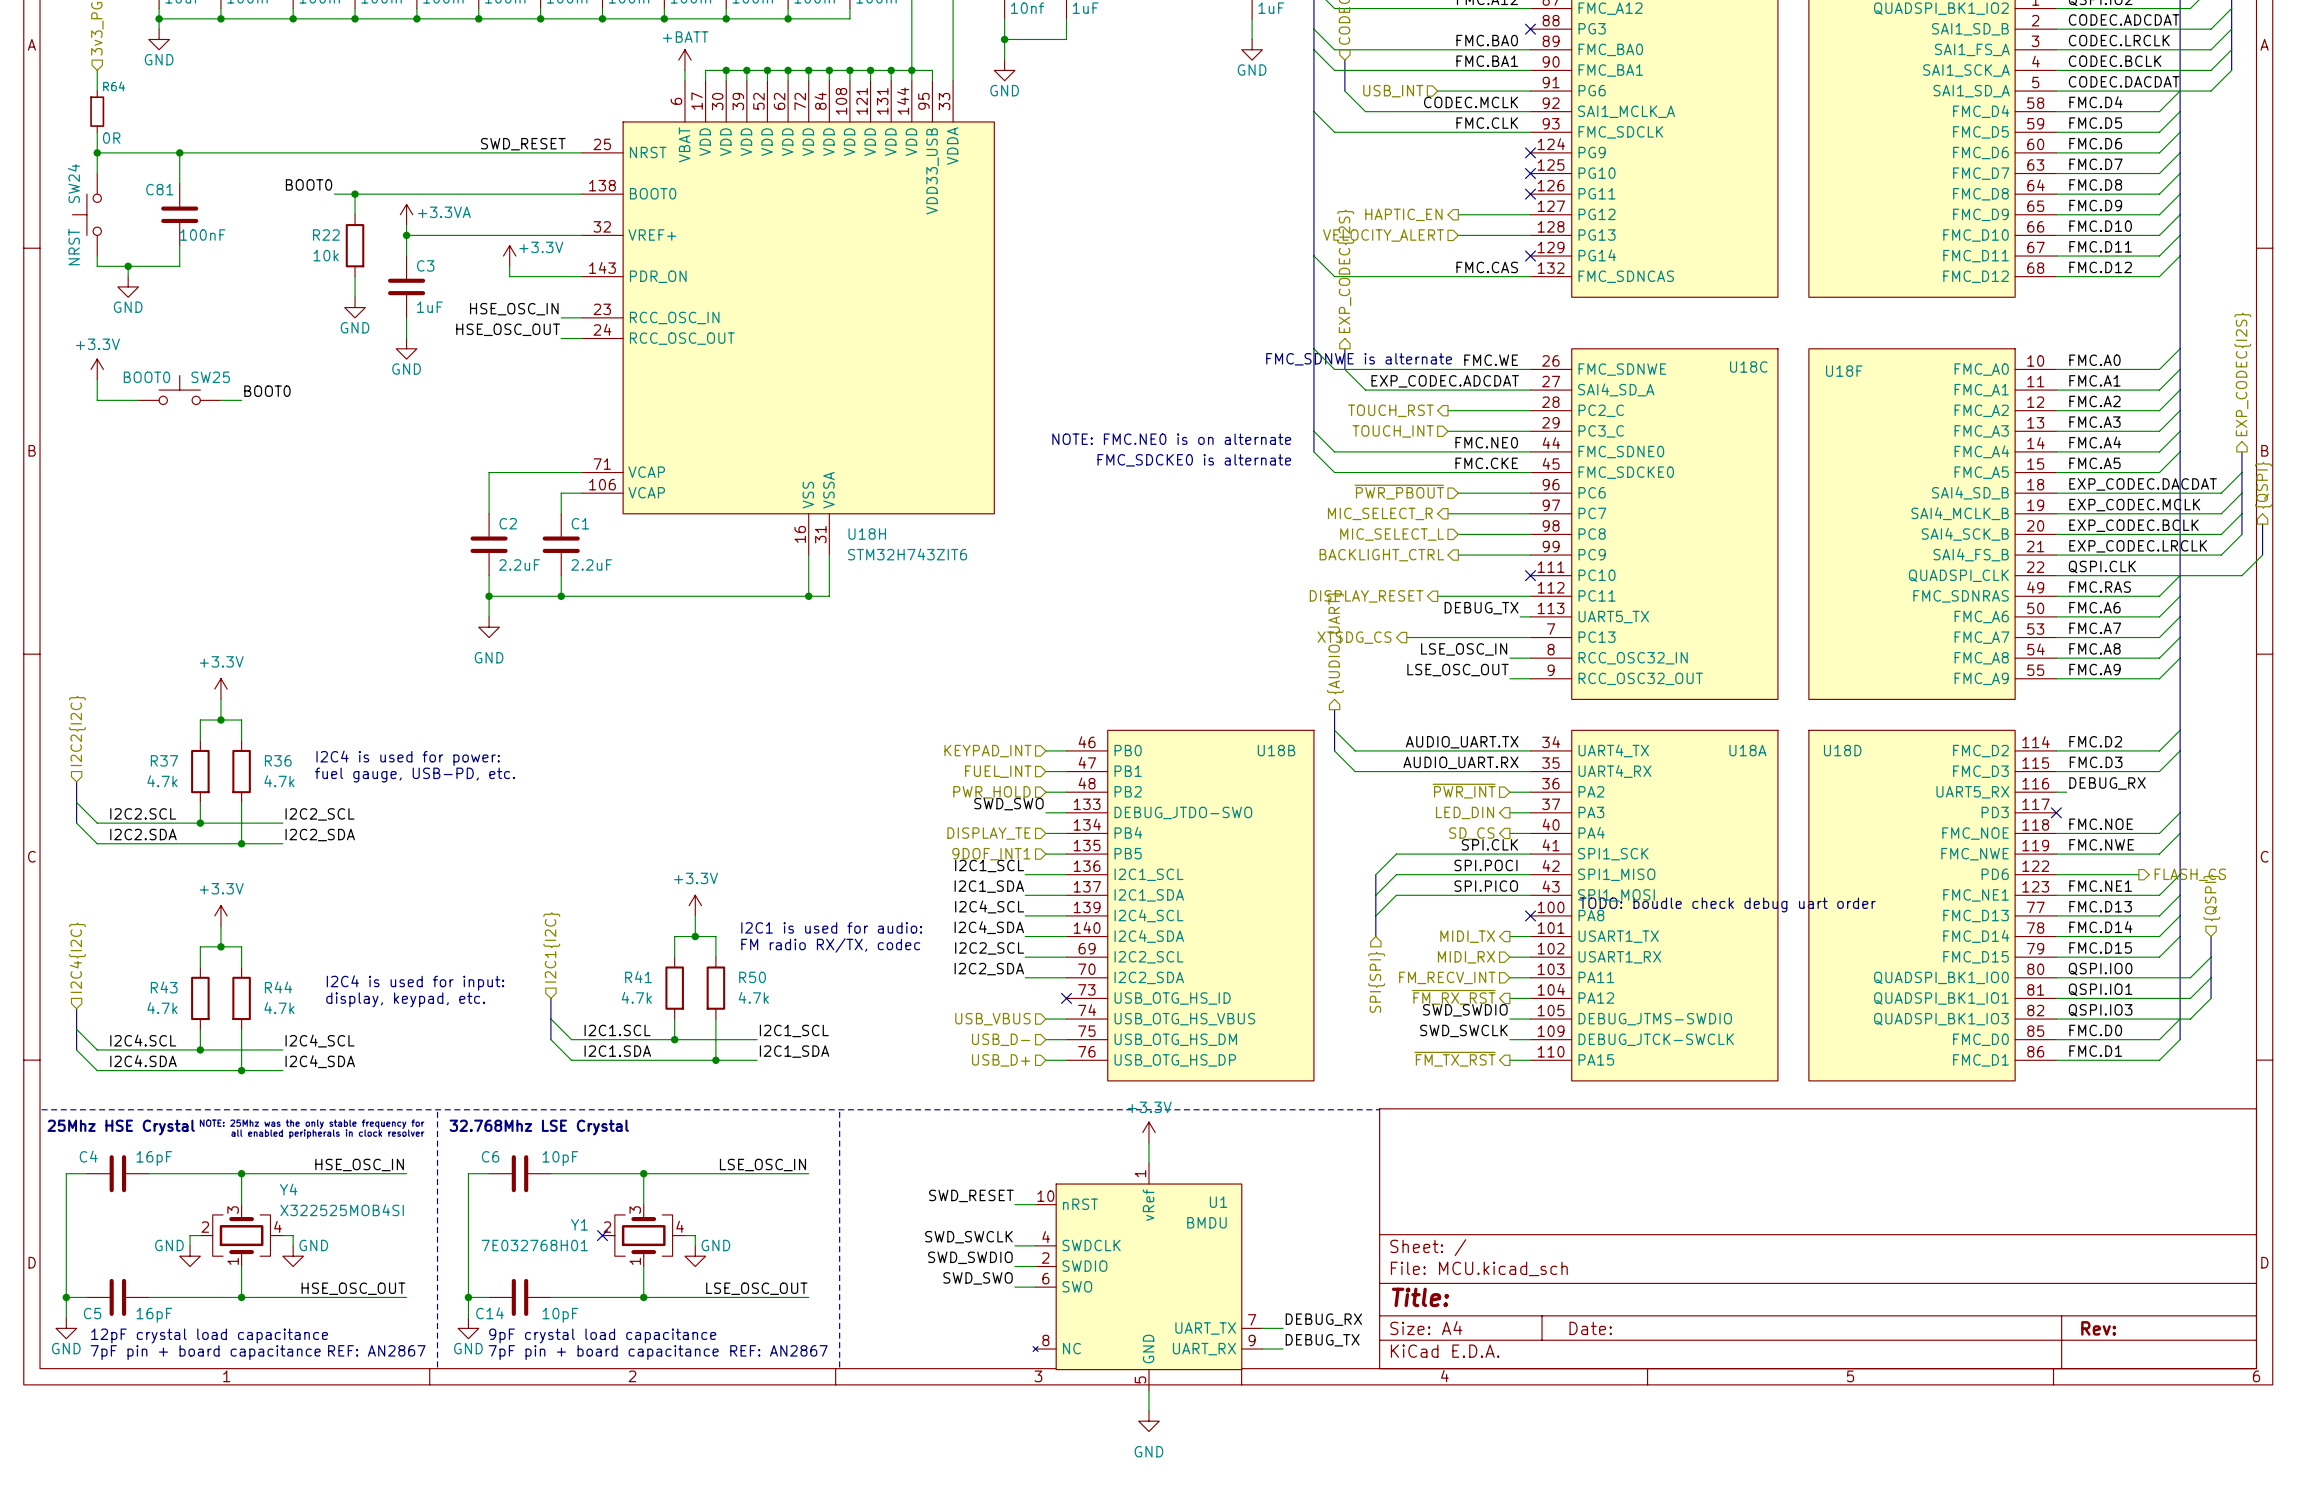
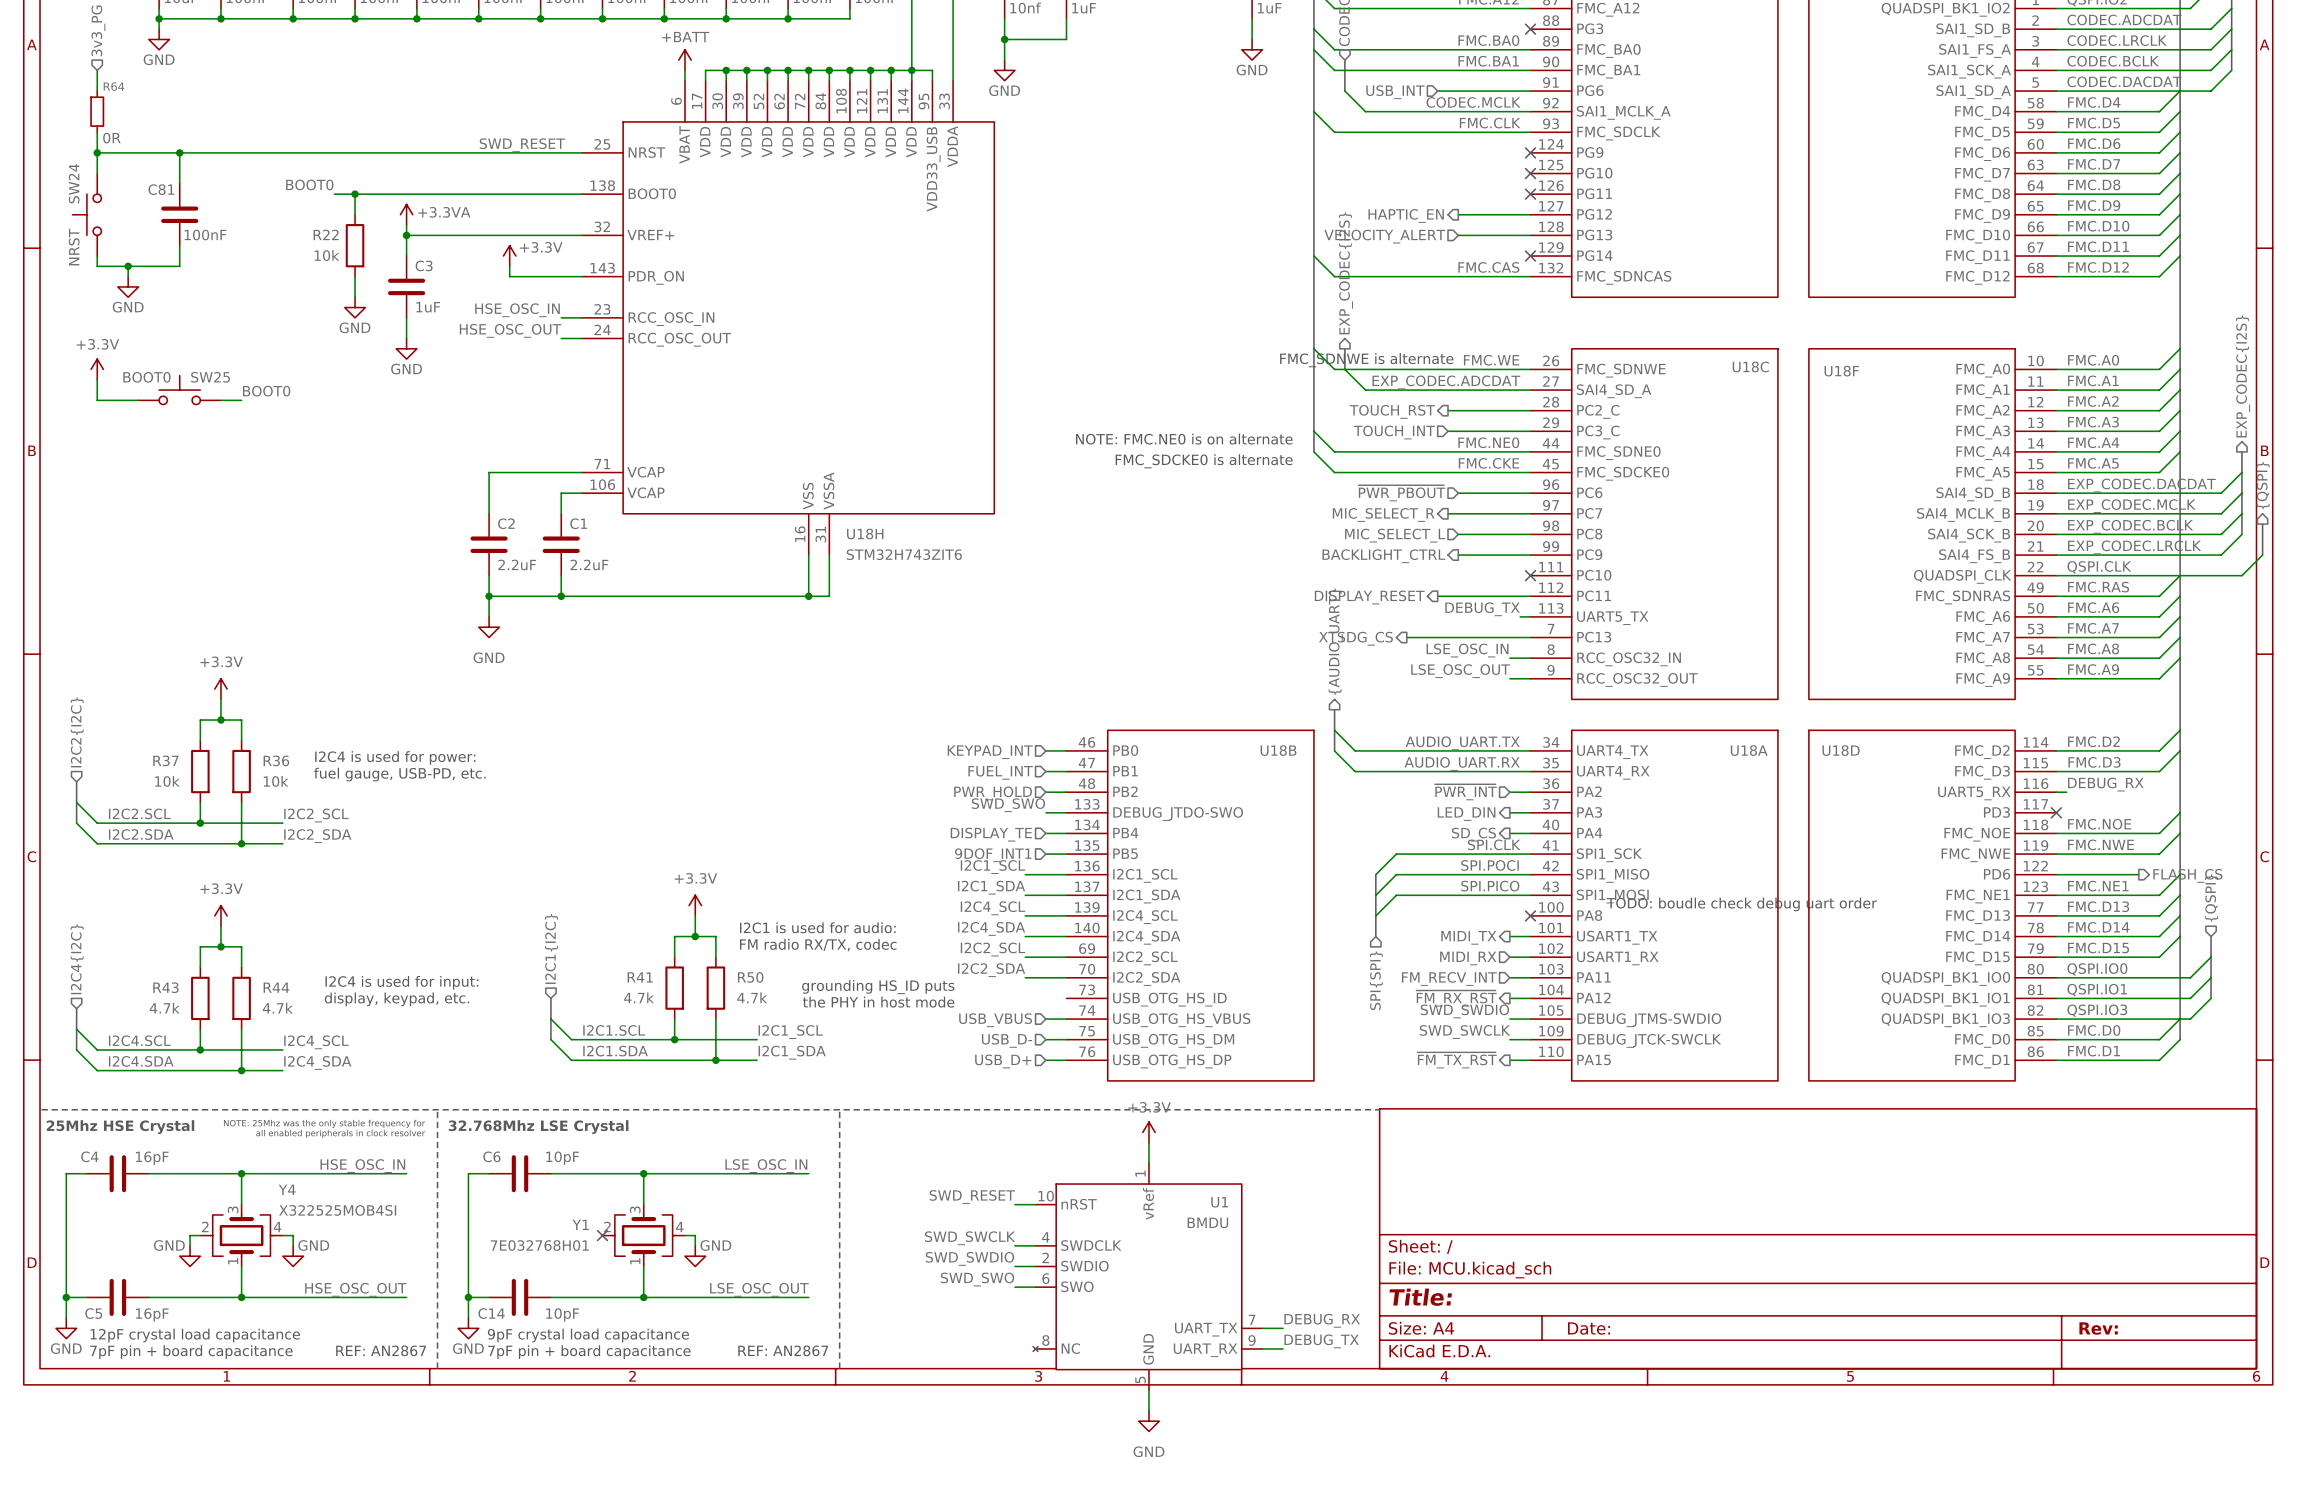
R37 value: 4.7k (162, 781) -> 10k (167, 781)
R36 value: 4.7k (279, 781) -> 10k (276, 781)
text: none -> grounding HS_ID puts (878, 987)
no-connect mark: (1066, 998) -> none
text: none -> the PHY in host mode (878, 1002)

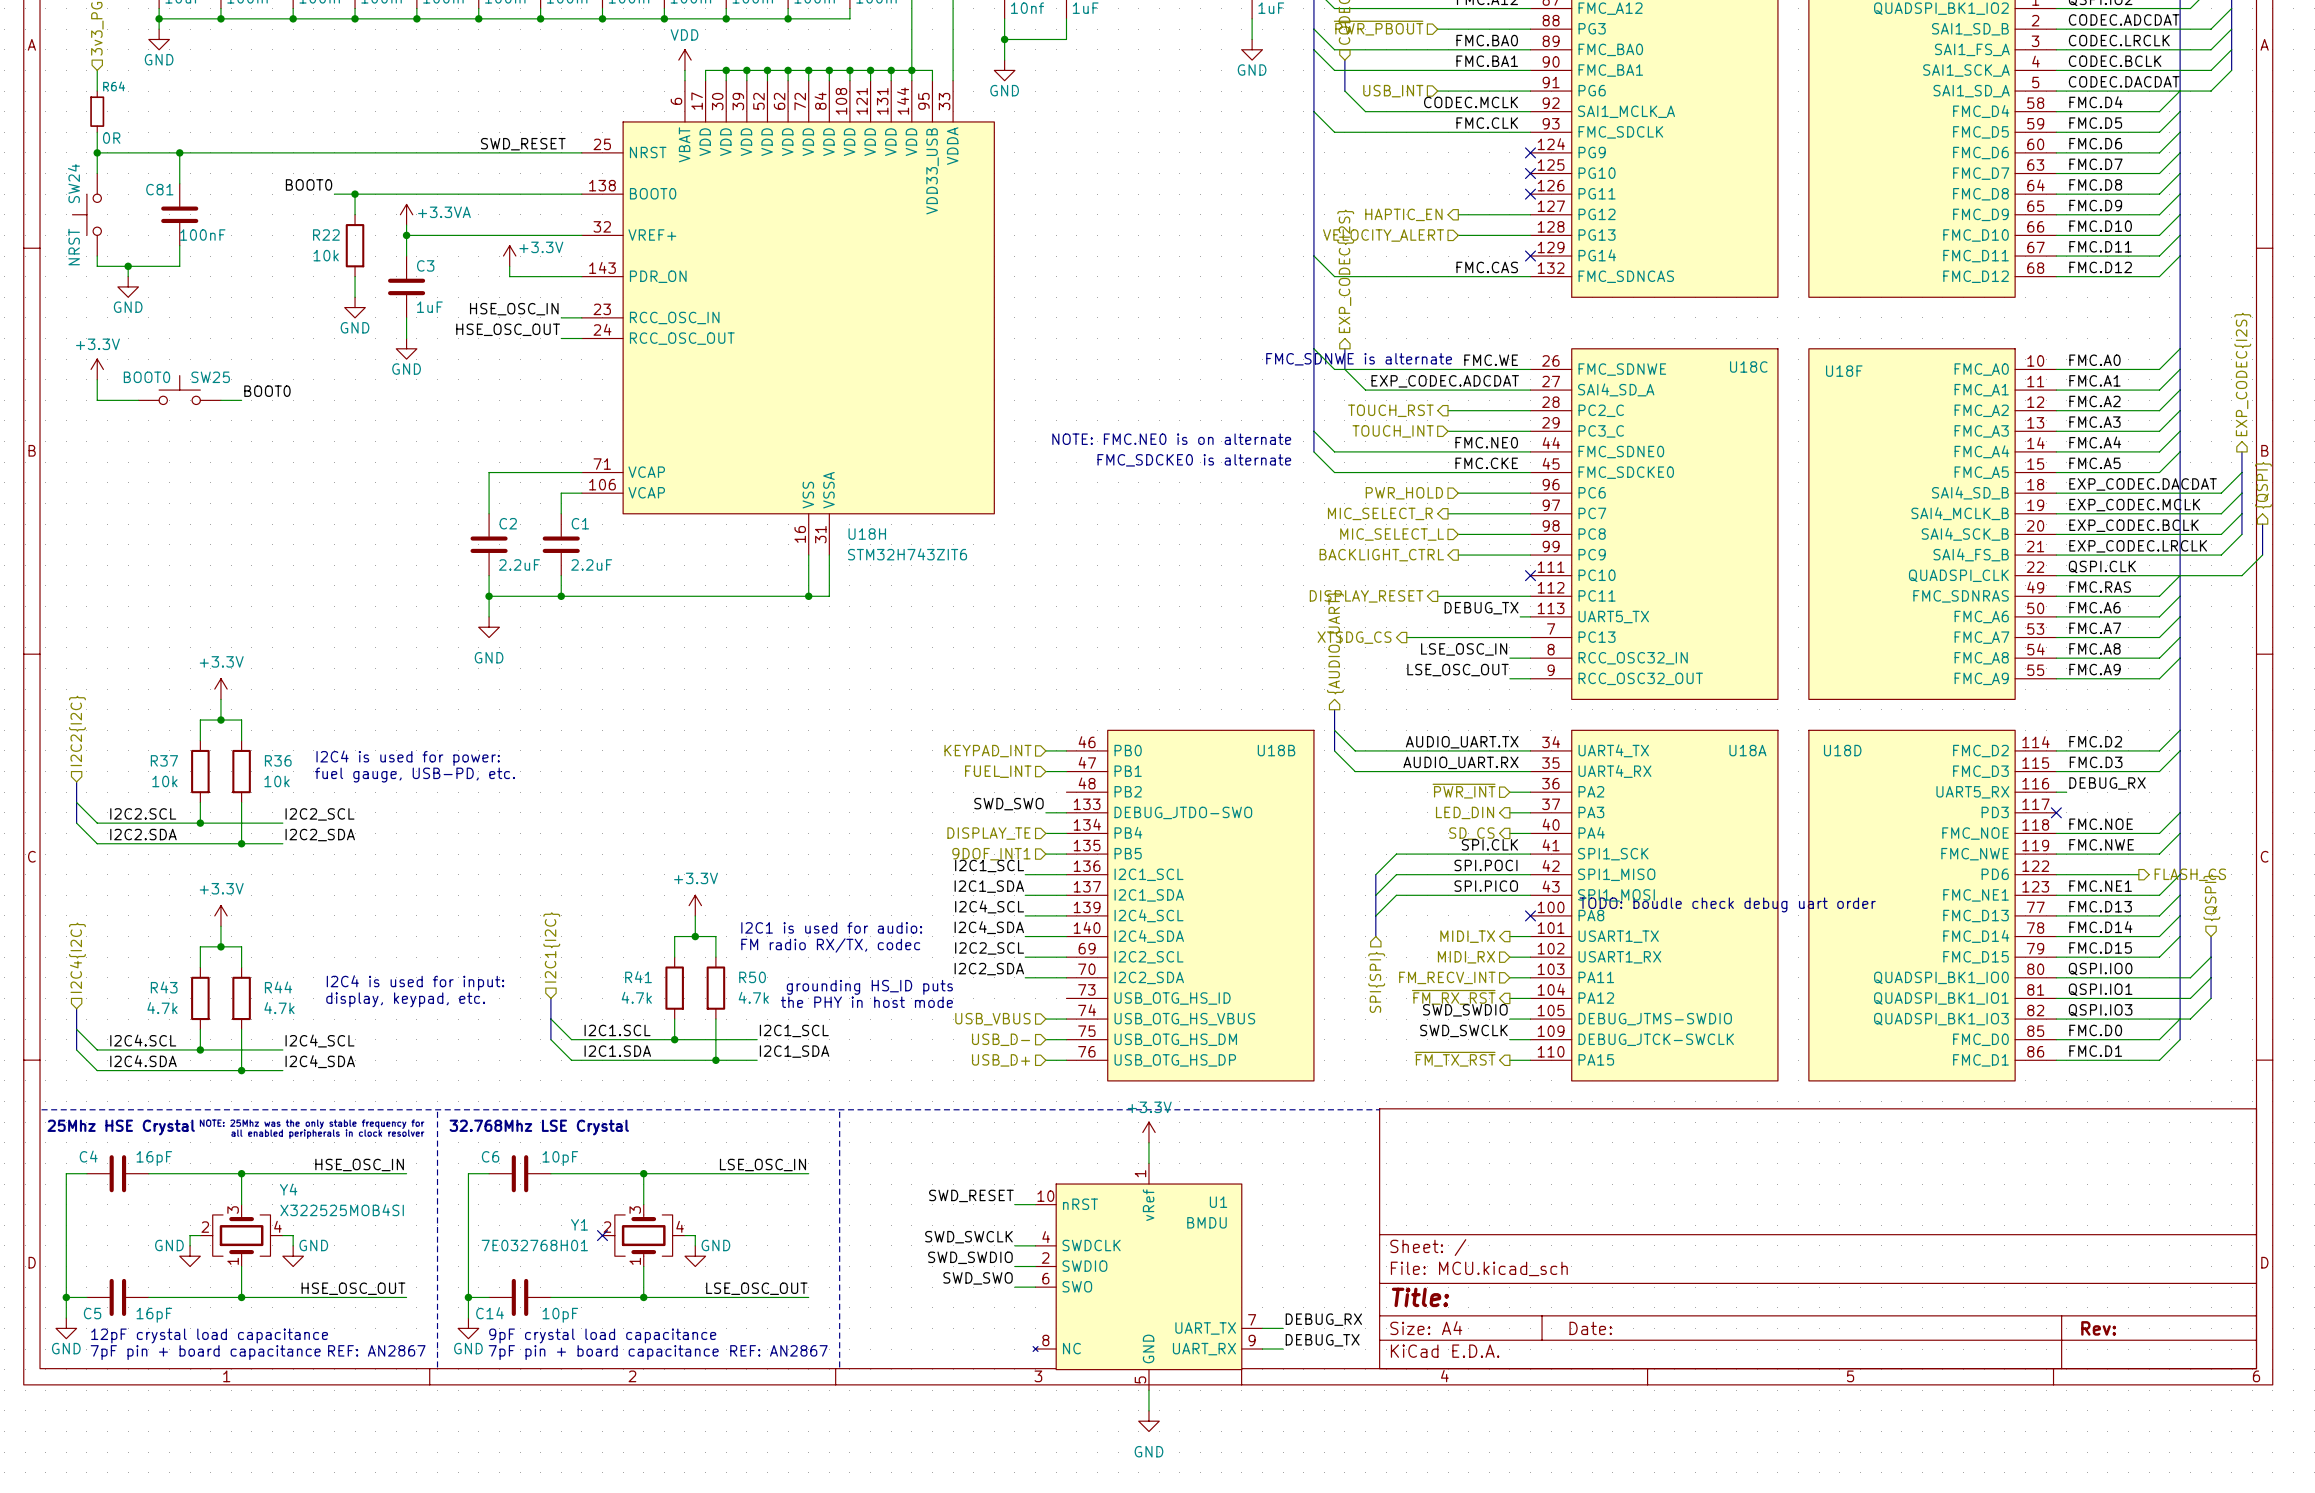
hierarchical label: none -> ~{PWR_PBOUT} (1378, 28)
wire: none -> (1437, 29) (1530, 29)
no-connect mark: (1530, 29) -> none
power symbol: +BATT (684, 60) -> VDD (684, 60)
hierarchical label: ~{PWR_PBOUT} (1401, 493) -> PWR_HOLD (1404, 493)
wire: (1045, 792) (1066, 792) -> none
hierarchical label: PWR_HOLD (993, 793) -> none

